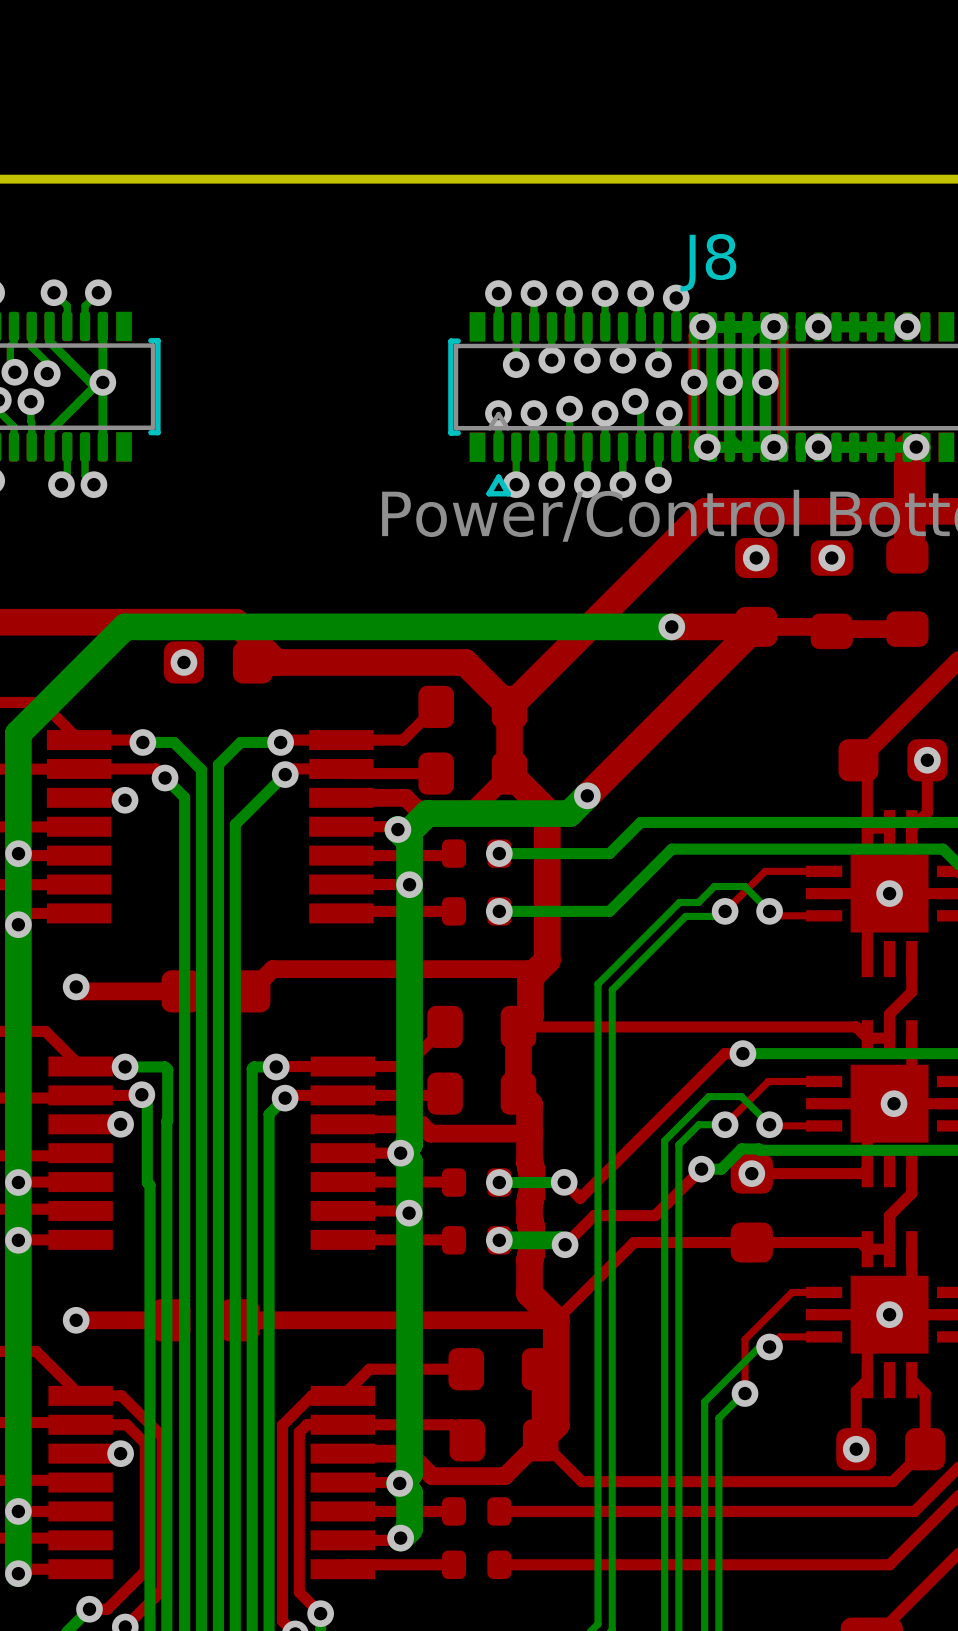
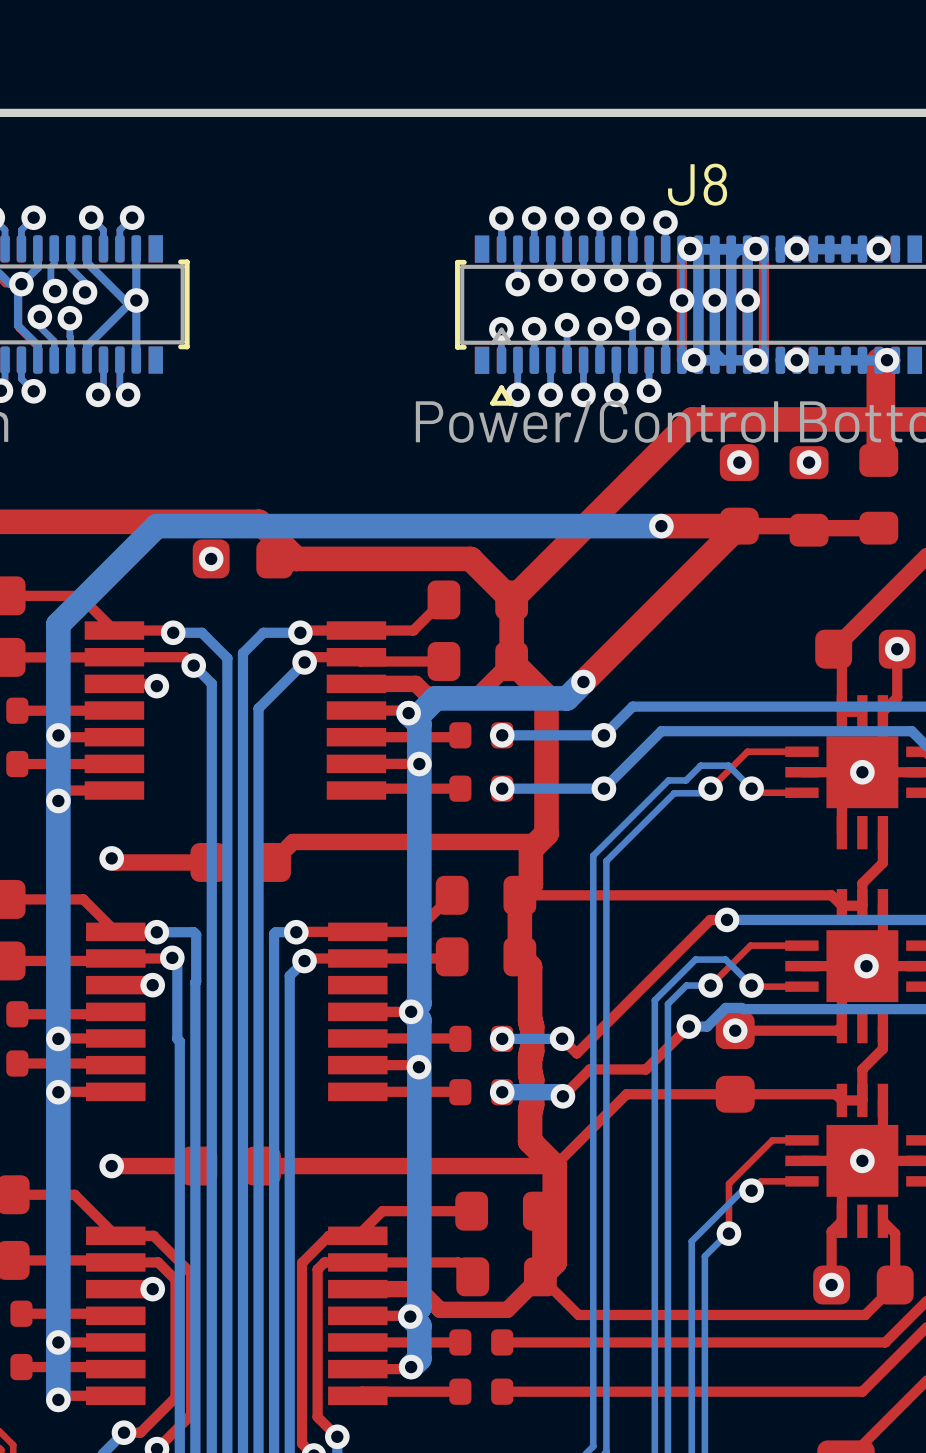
via: none -> (603, 735)
via: none -> (603, 788)
top track: (342, 1124) (421, 1124) (430, 1133) (529, 1133) -> none

